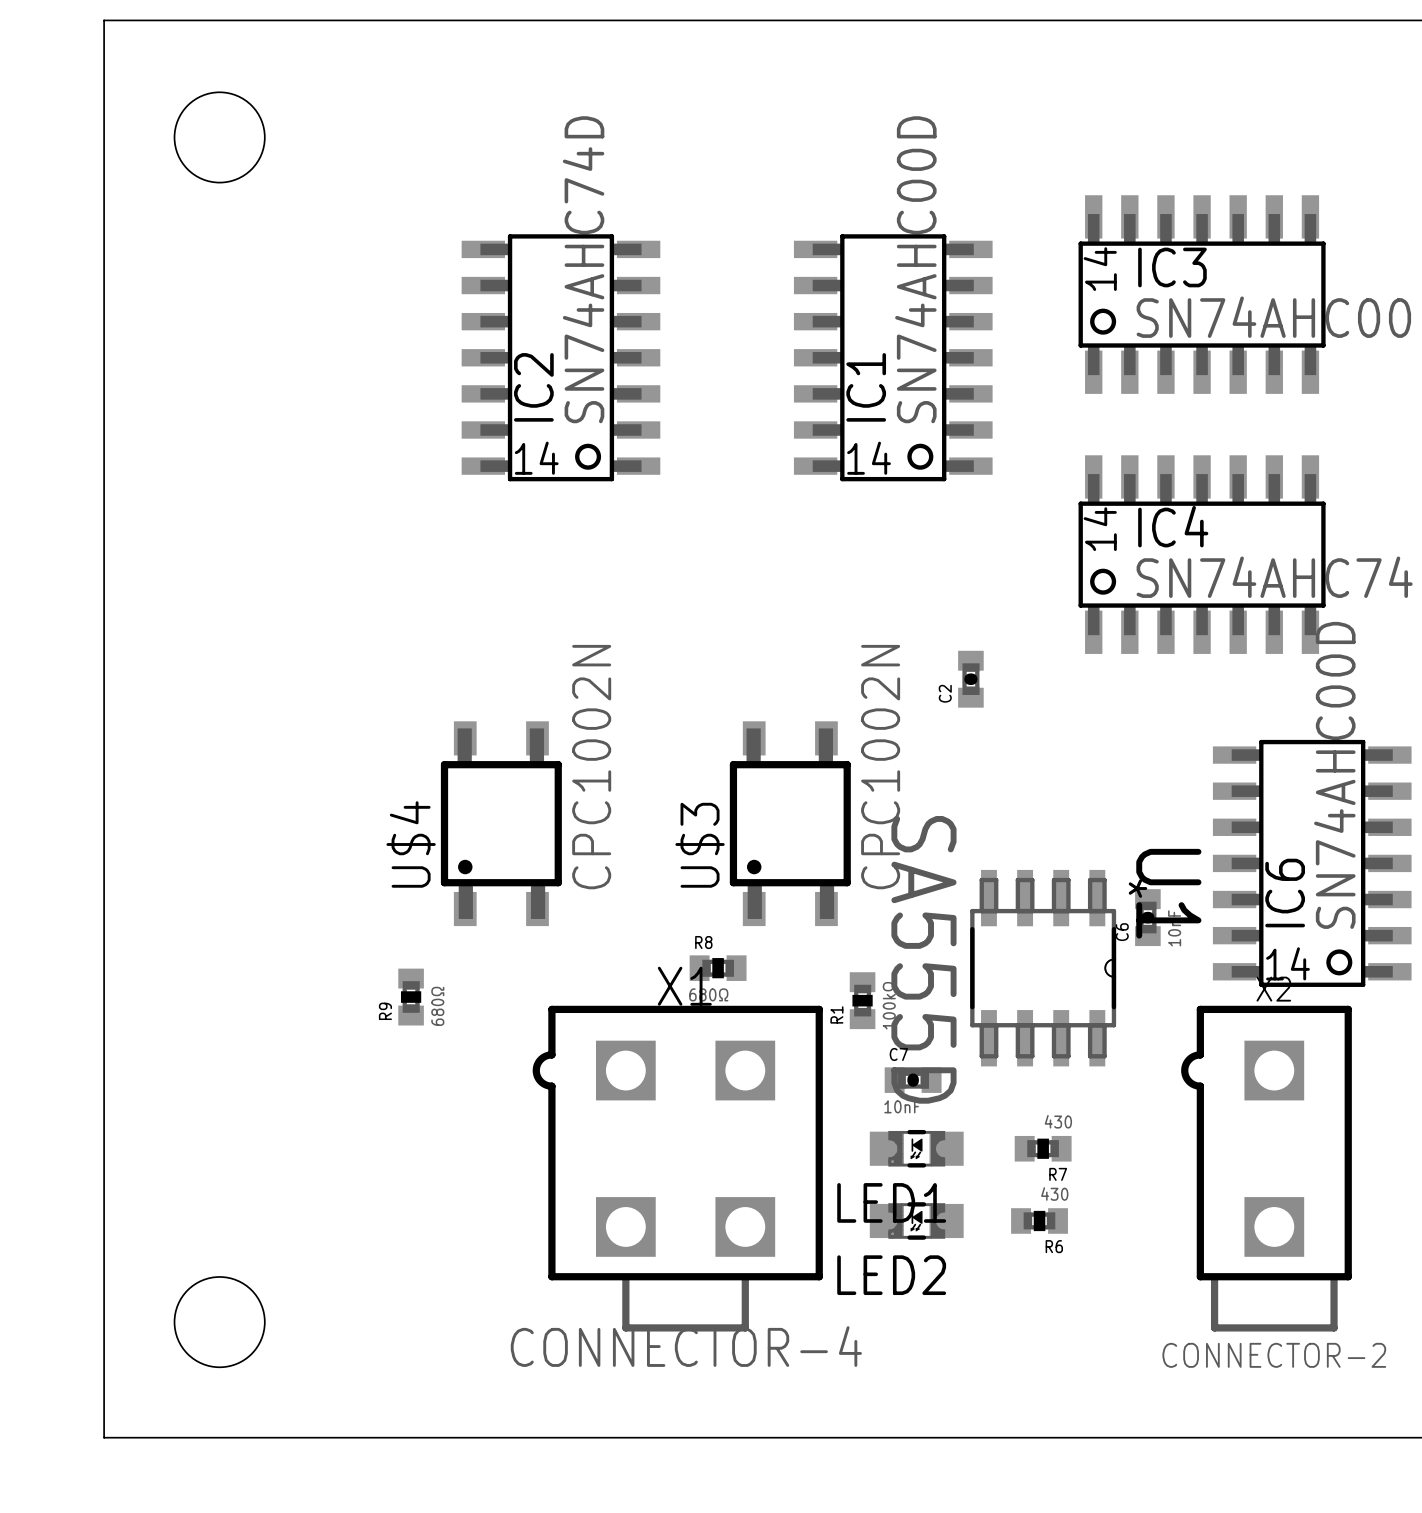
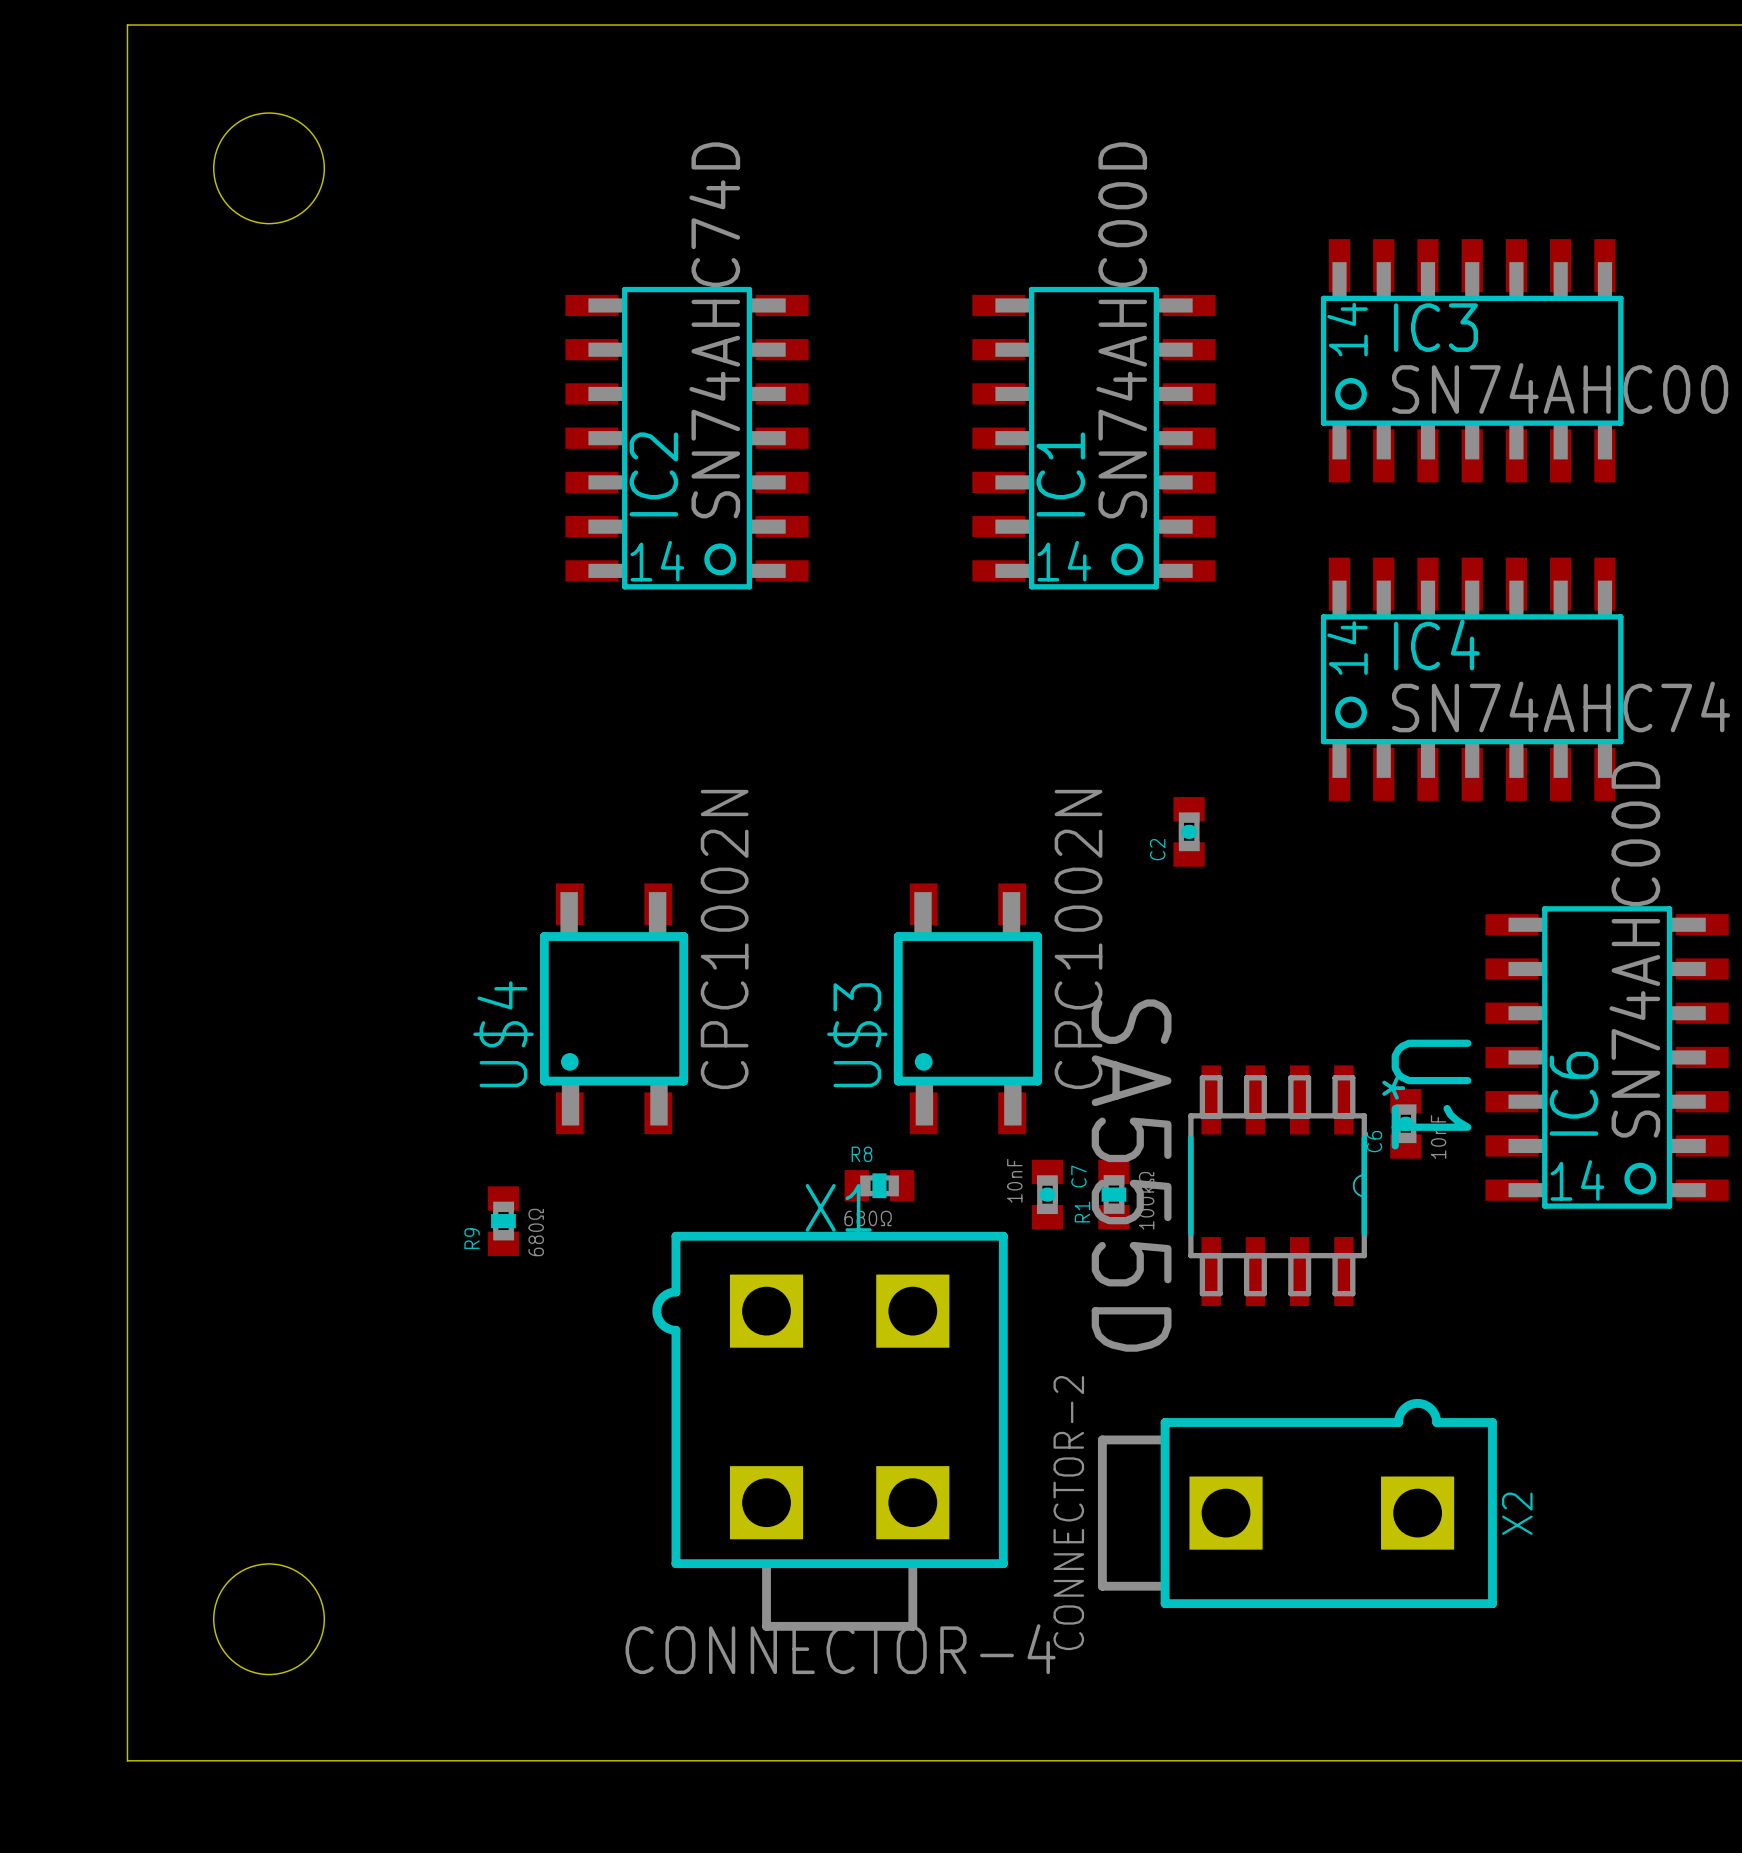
R1 position: (862, 1000) -> (1113, 1194)
C7 rotation: 0° (913, 1080) -> 90° clockwise (1047, 1194)
C7 position: (913, 1080) -> (1047, 1194)
LED1: (916, 1148) -> none
R7: 430 (1043, 1148) -> none
X2 rotation: 0° (1266, 1168) -> 90° clockwise (1297, 1503)
X2 position: (1266, 1168) -> (1297, 1503)
LED2: (916, 1220) -> none
R6: 430 (1039, 1220) -> none

